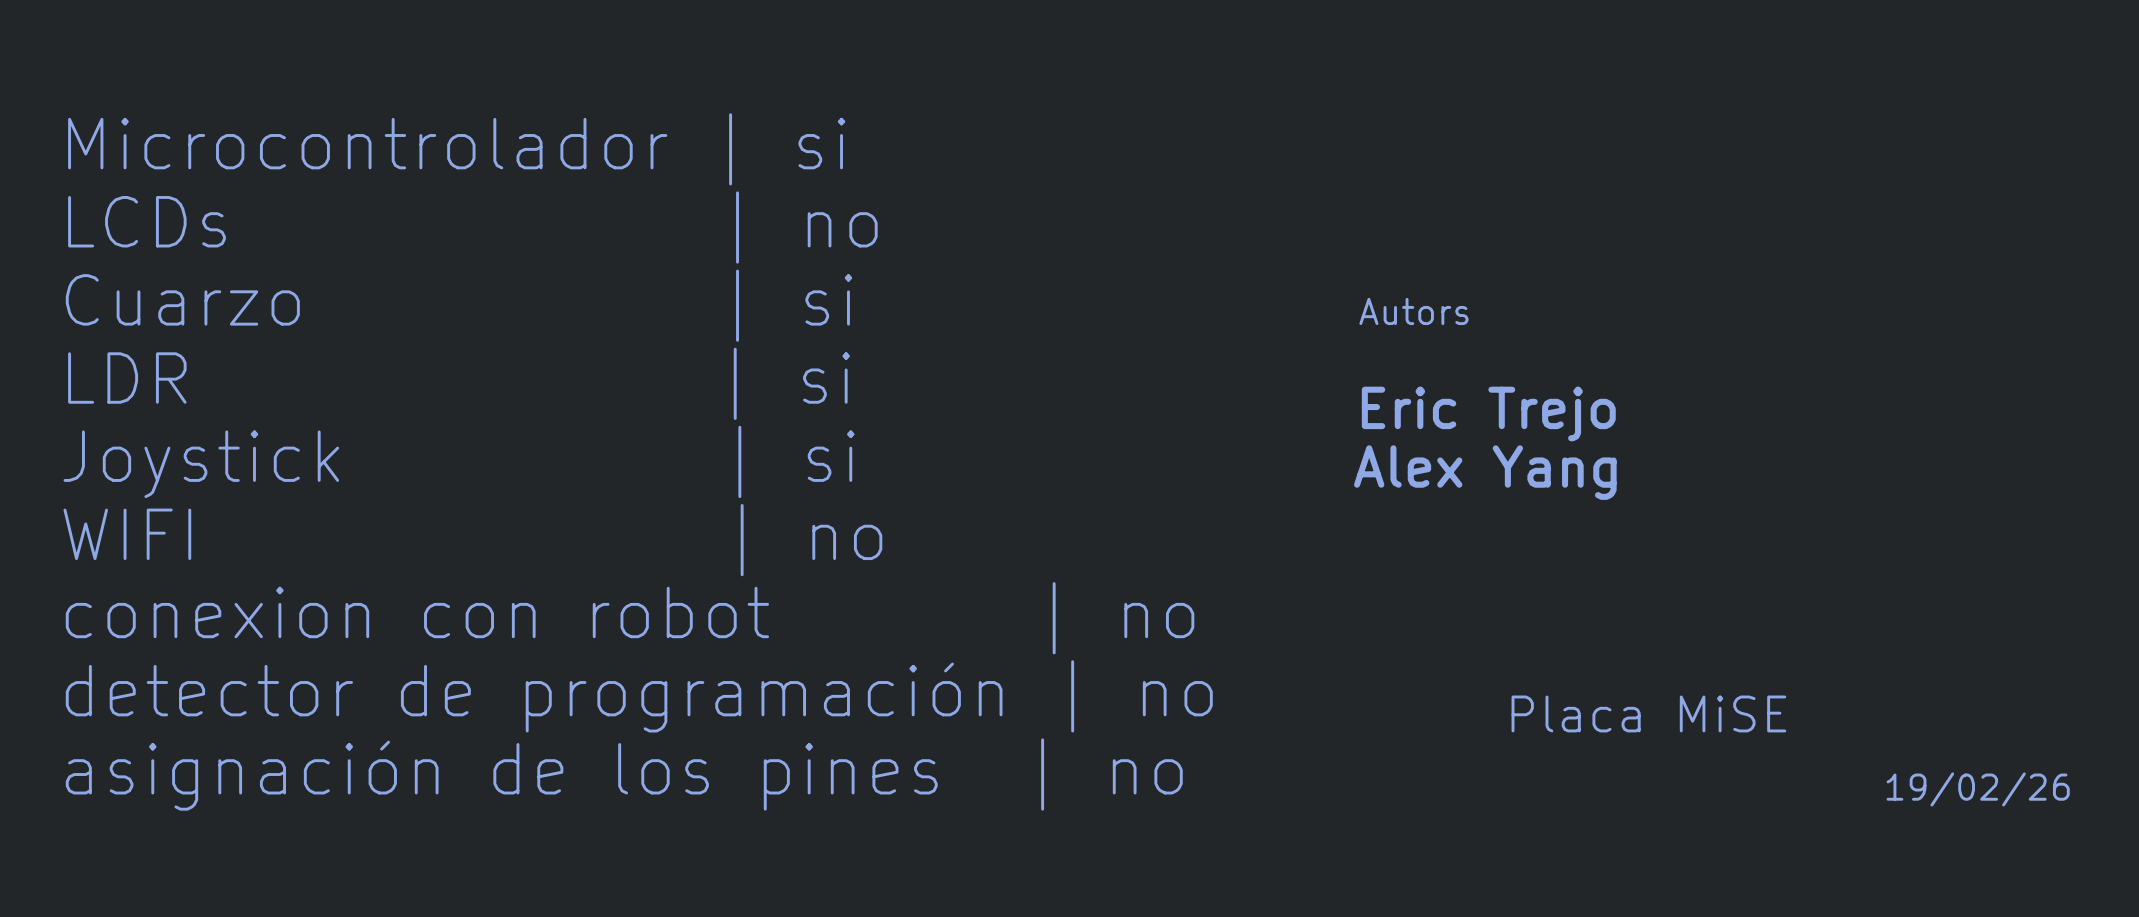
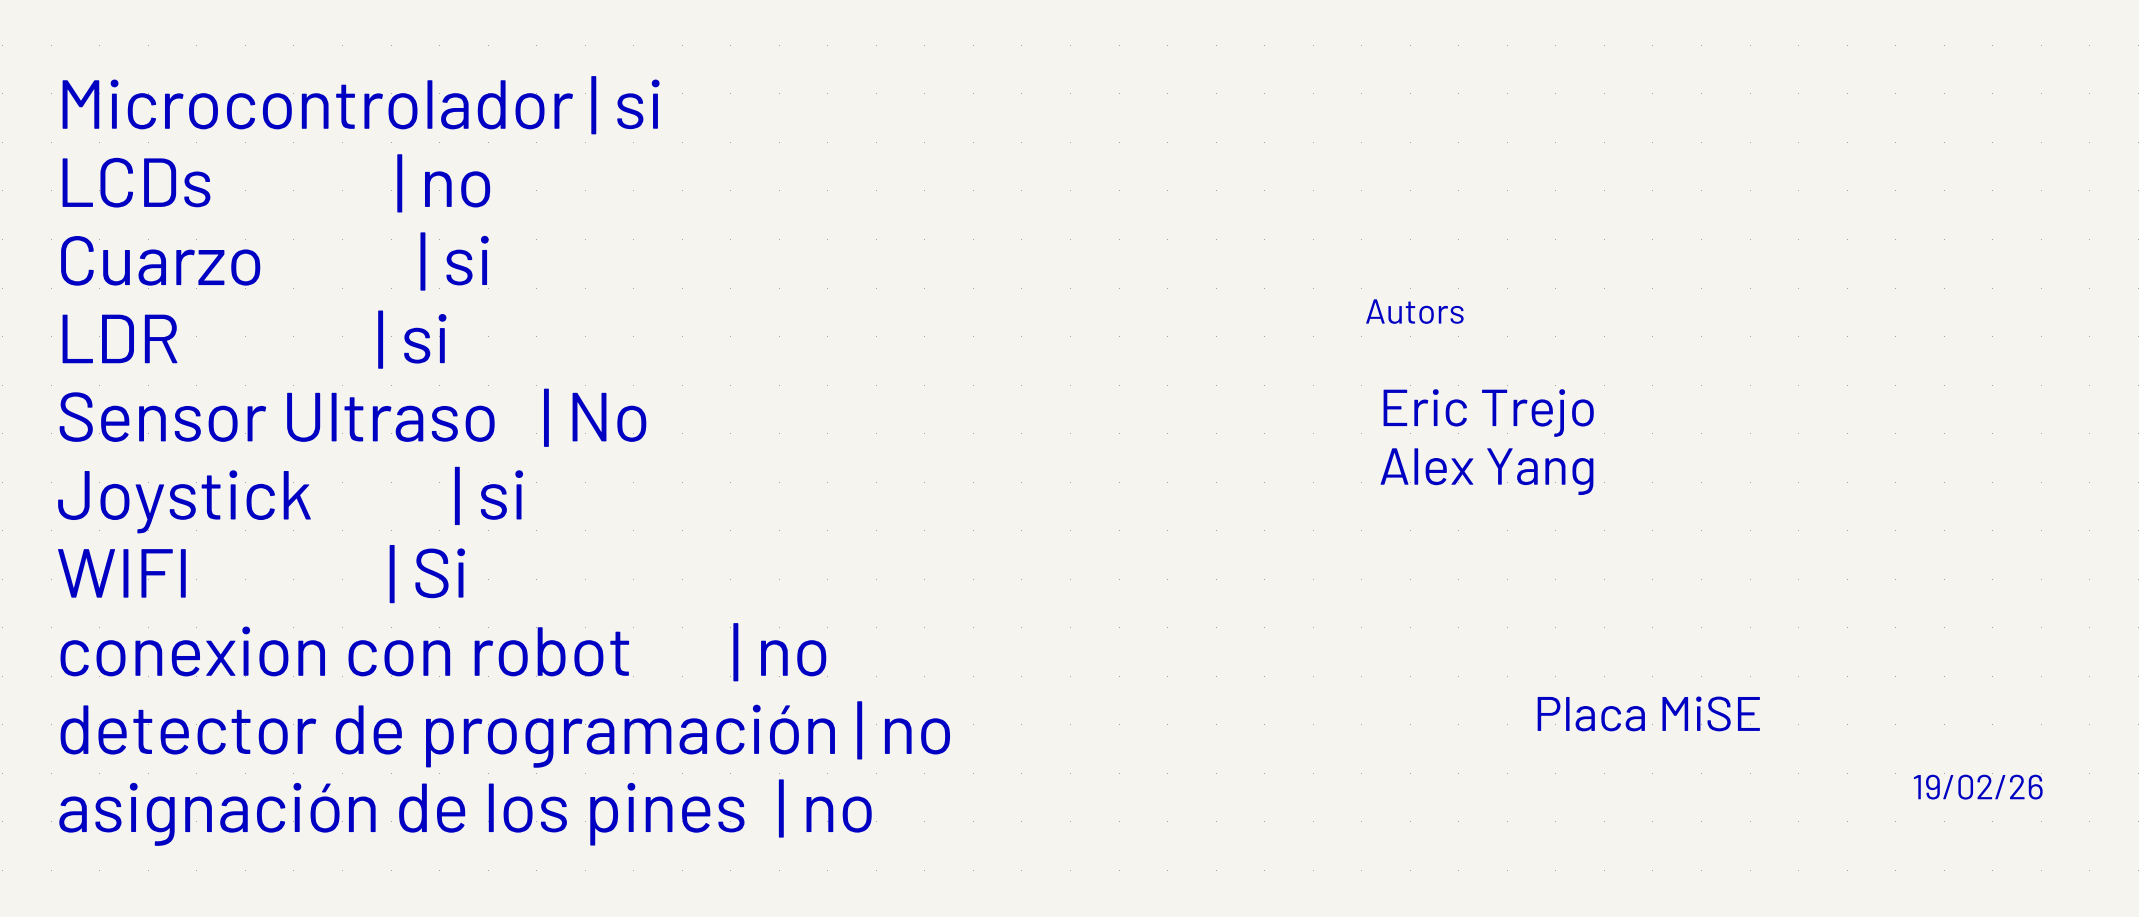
text position: Microcontrolador | si (456, 149) -> Microcontrolador | si (361, 105)
text position: LCDs | no (472, 227) -> LCDs | no (276, 183)
text position: Cuarzo | si️ (459, 305) -> Cuarzo | si️ (274, 261)
text position: LDR | si (459, 383) -> LDR | si (254, 339)
text: none -> Sensor Ultraso | No (353, 417)
text position: Joystick | si (459, 461) -> Joystick | si (290, 500)
text: WIFI | no (472, 540) -> WIFI | Si (261, 574)
text position: conexion con robot | no (630, 618) -> conexion con robot | no (443, 652)
text position: detector de programación | no (639, 696) -> detector de programación | no (505, 734)
text position: asignación de los pines | no (624, 774) -> asignación de los pines | no (465, 812)

